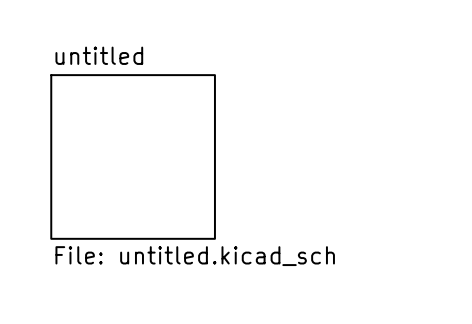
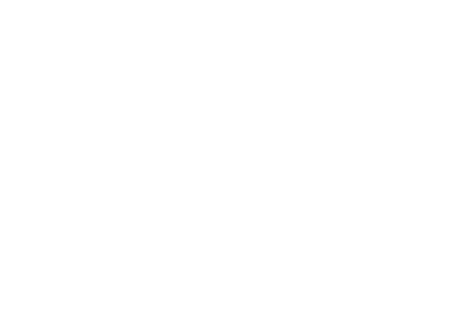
sheet untitled: File: untitled.kicad_sch (133, 156) -> none

